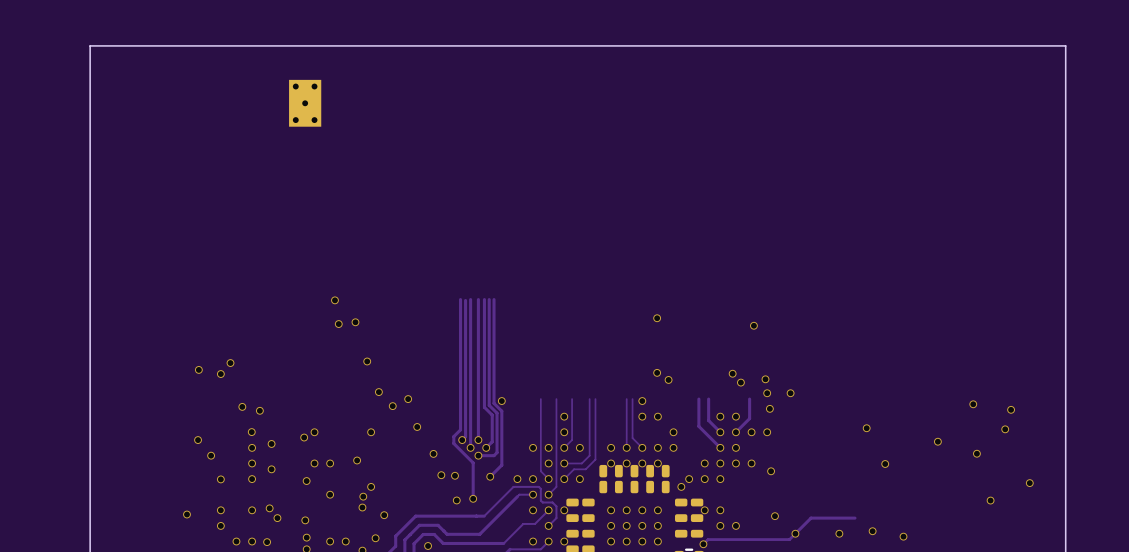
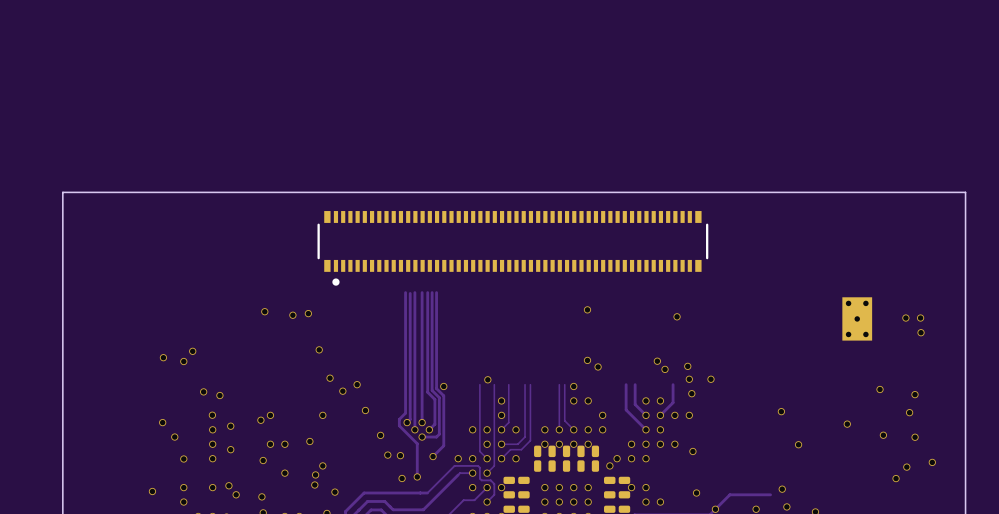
part: (305, 103) -> none
board edge: (1065, 191) (1065, 45) (90, 45) (90, 191) -> (965, 192) (62, 192)
part: none -> (512, 248)
via position: (334, 300) -> (264, 311)
via: none -> (905, 318)
via: none -> (920, 318)
part: none -> (857, 318)
via: none -> (921, 332)
via: none -> (487, 379)
via: none -> (915, 437)
via: none -> (906, 467)
via: none -> (782, 489)

